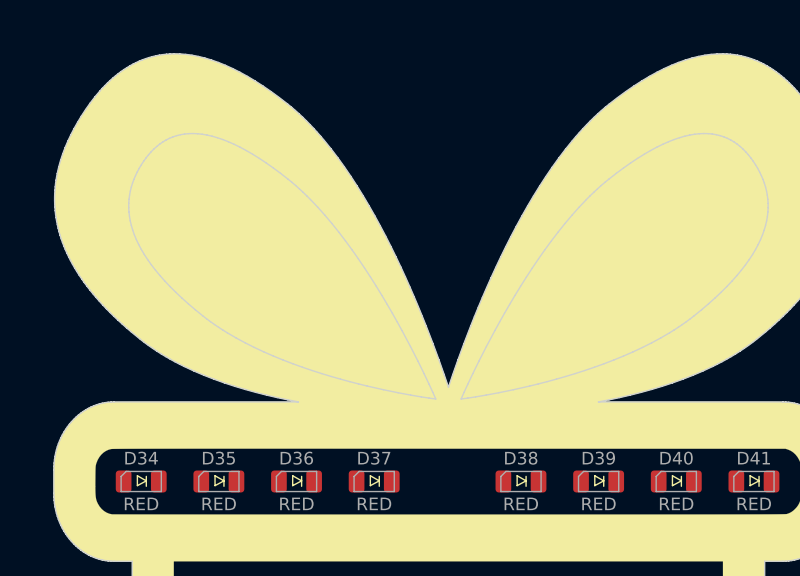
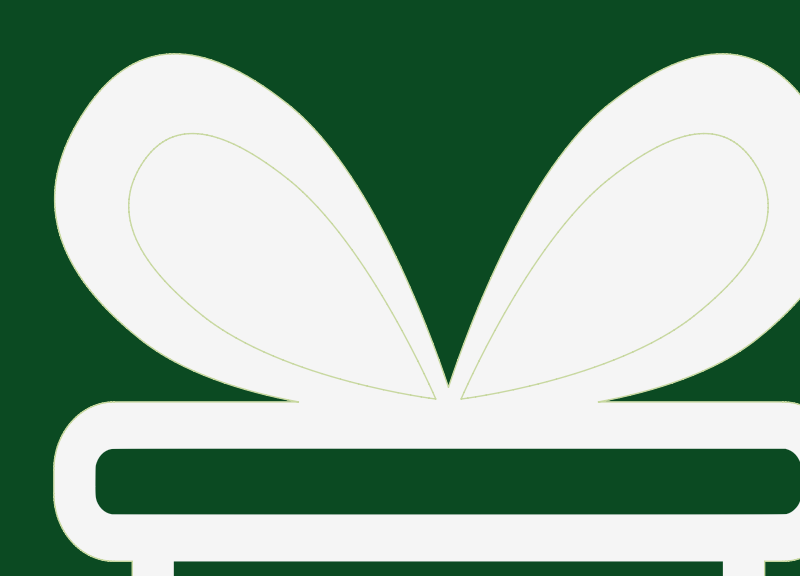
D34: RED (141, 481) -> none
D35: RED (218, 481) -> none
D36: RED (296, 481) -> none
D37: RED (374, 481) -> none
D38: RED (520, 481) -> none
D39: RED (598, 481) -> none
D40: RED (676, 481) -> none
D41: RED (753, 481) -> none

